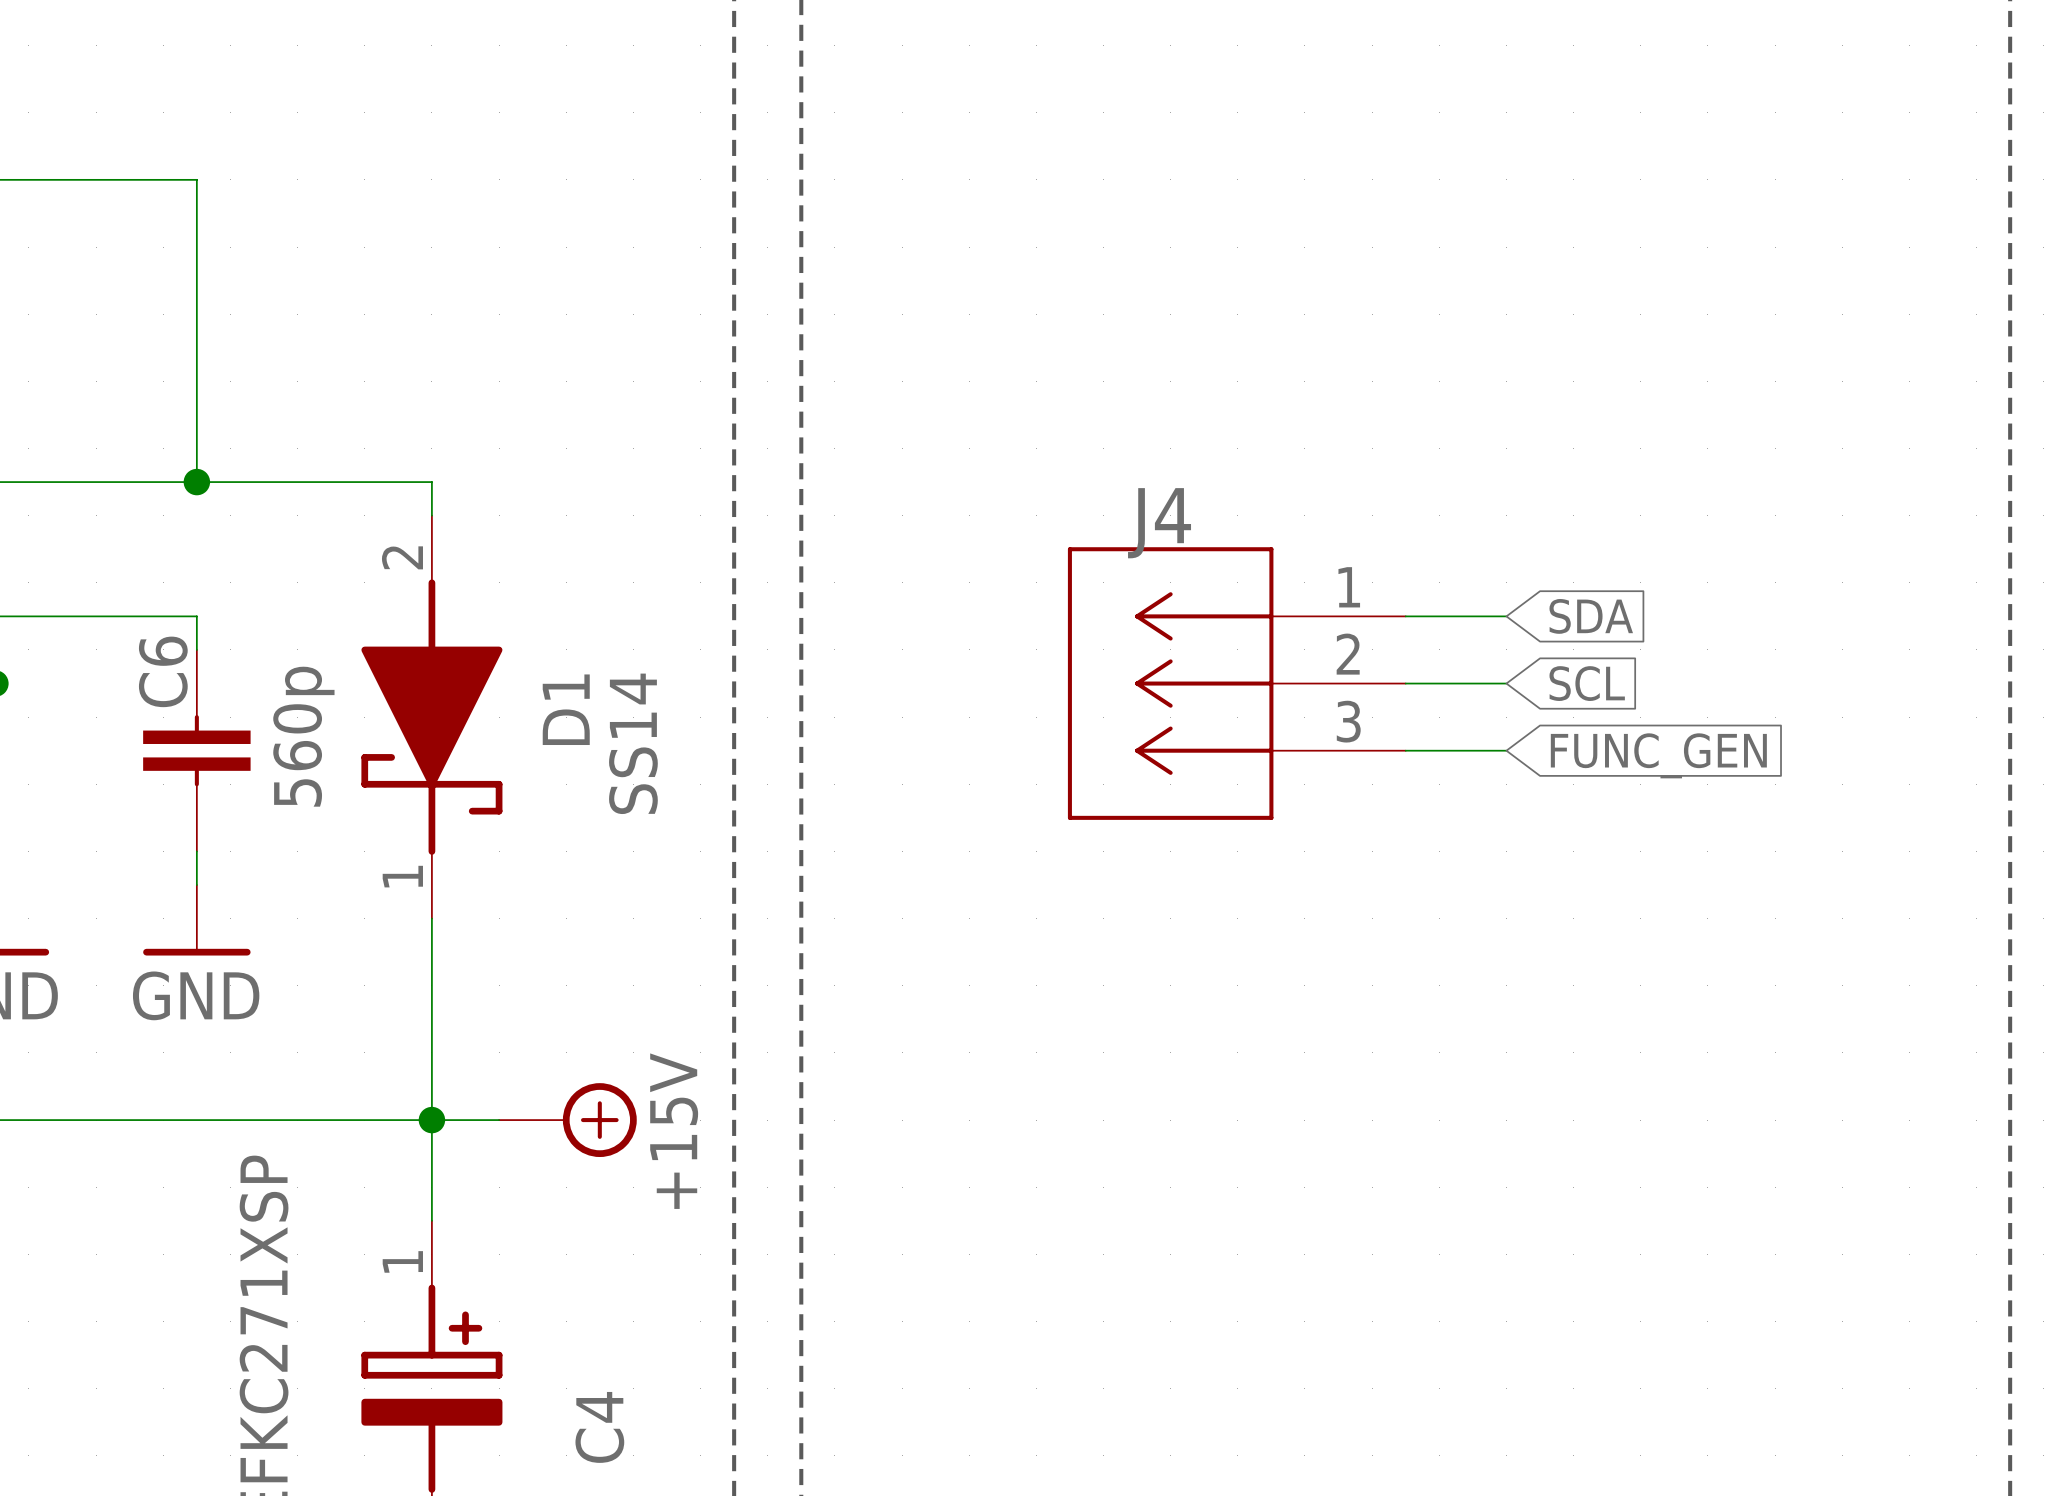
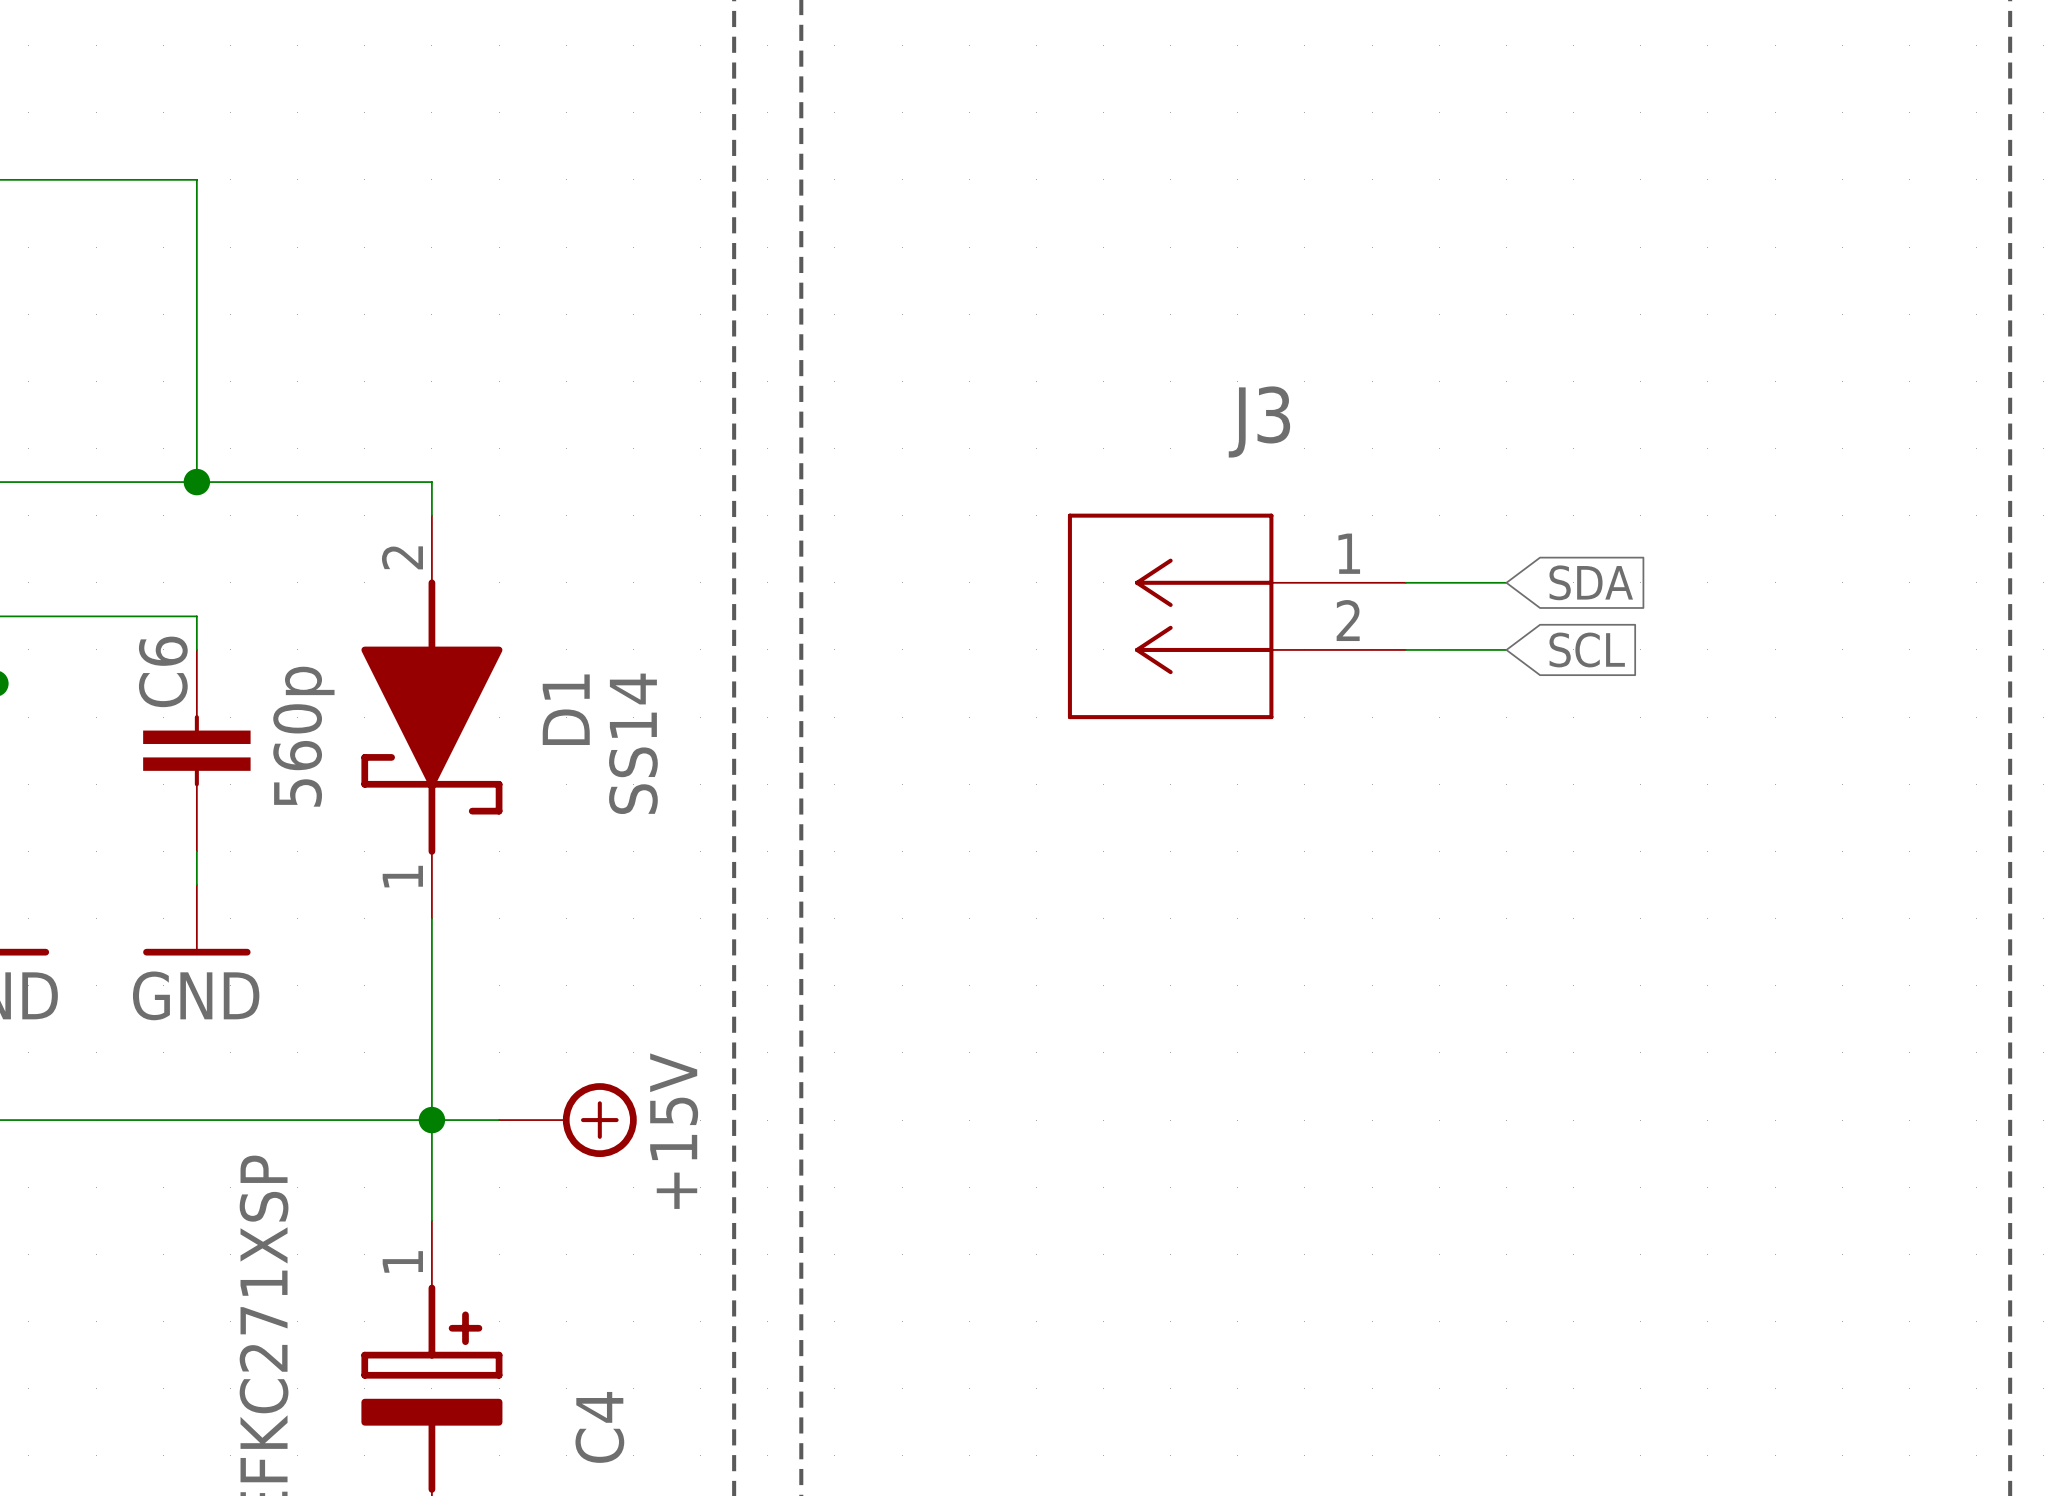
J3: none -> (1236, 616)
wire: (1405, 616) (1506, 616) -> (1405, 582) (1506, 582)
global label position: SDA (1591, 616) -> SDA (1591, 582)
J4: (1236, 683) -> none
wire: (1405, 683) (1506, 683) -> (1405, 649) (1506, 649)
global label position: SCL (1587, 683) -> SCL (1587, 649)
wire: (1405, 750) (1506, 750) -> none
global label: FUNC_GEN (1658, 755) -> none

